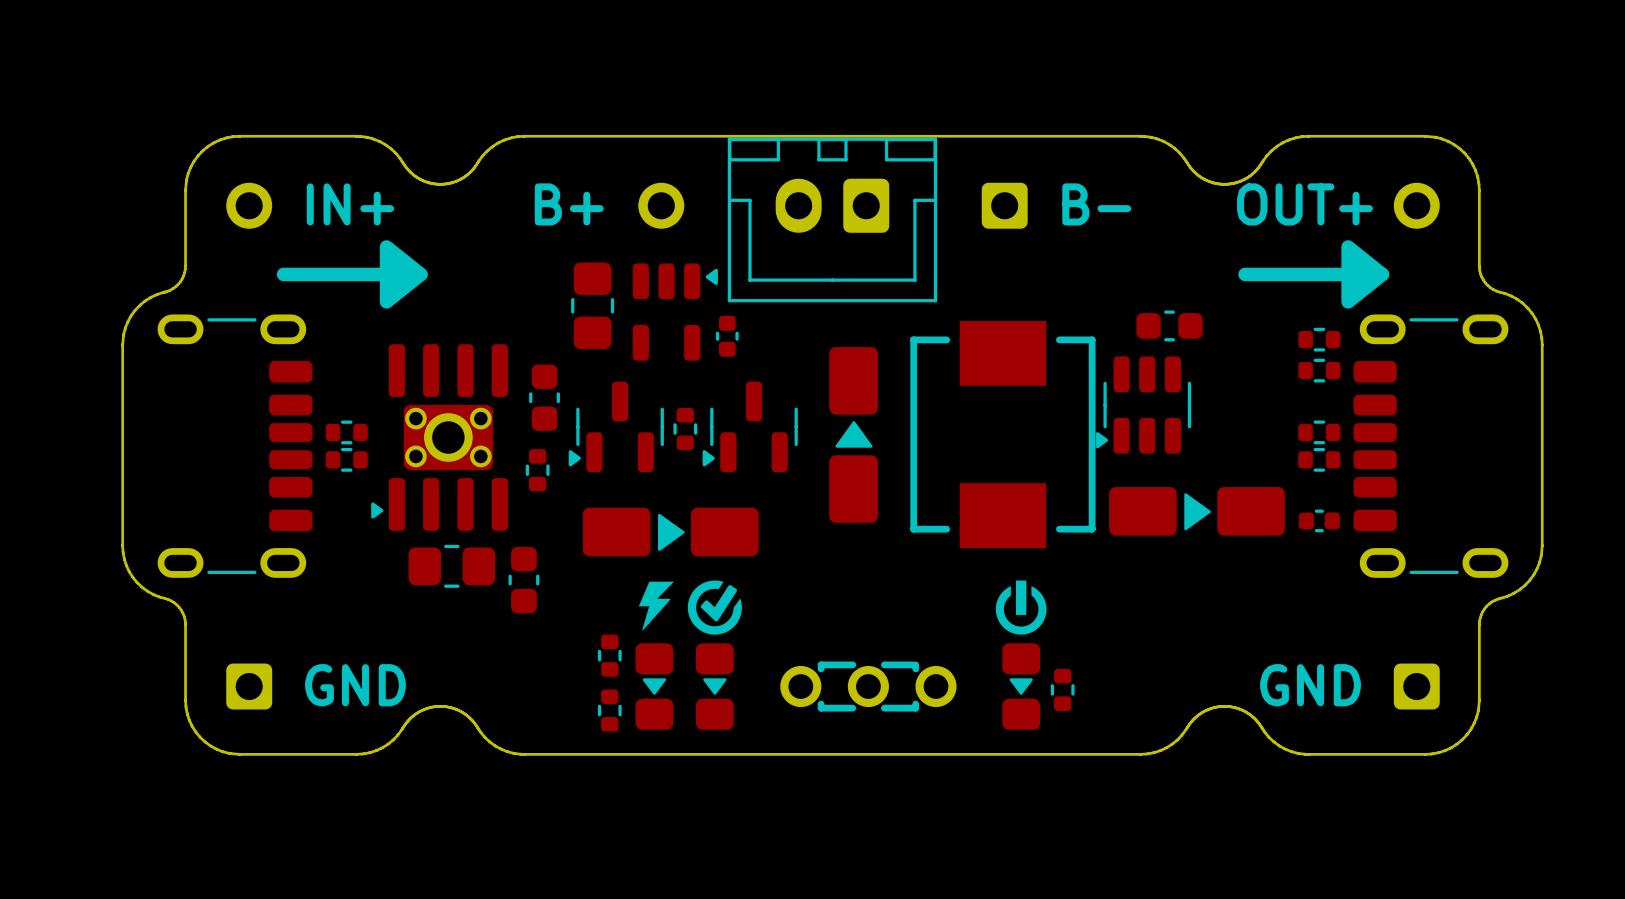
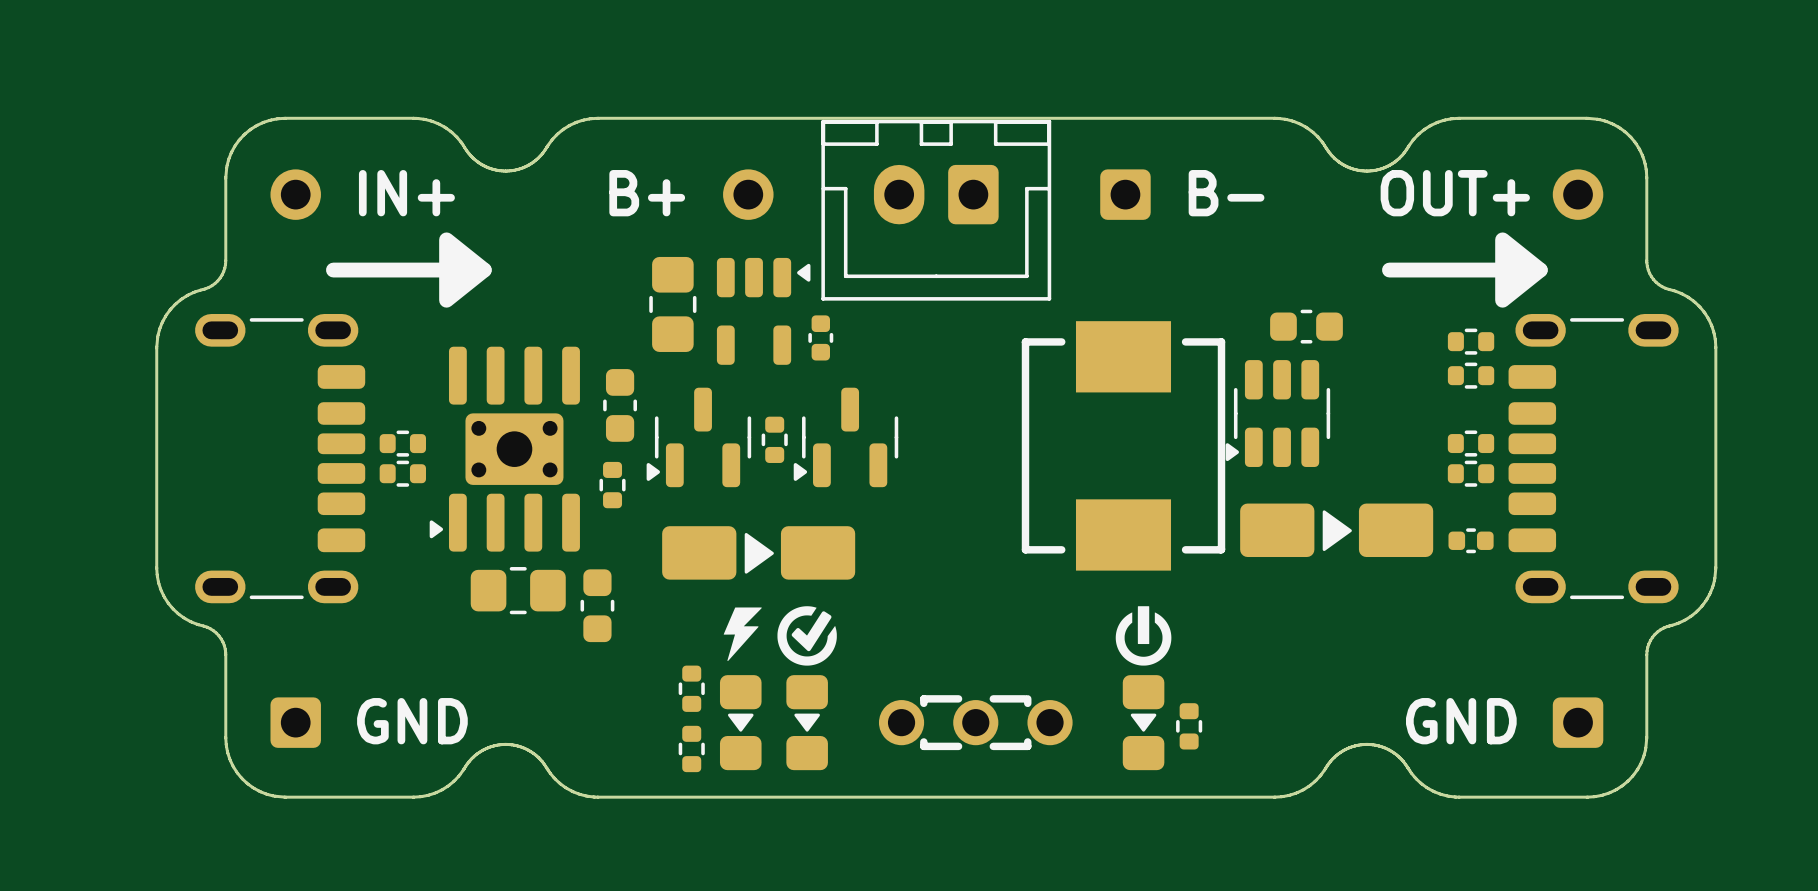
part: (853, 434) -> none

